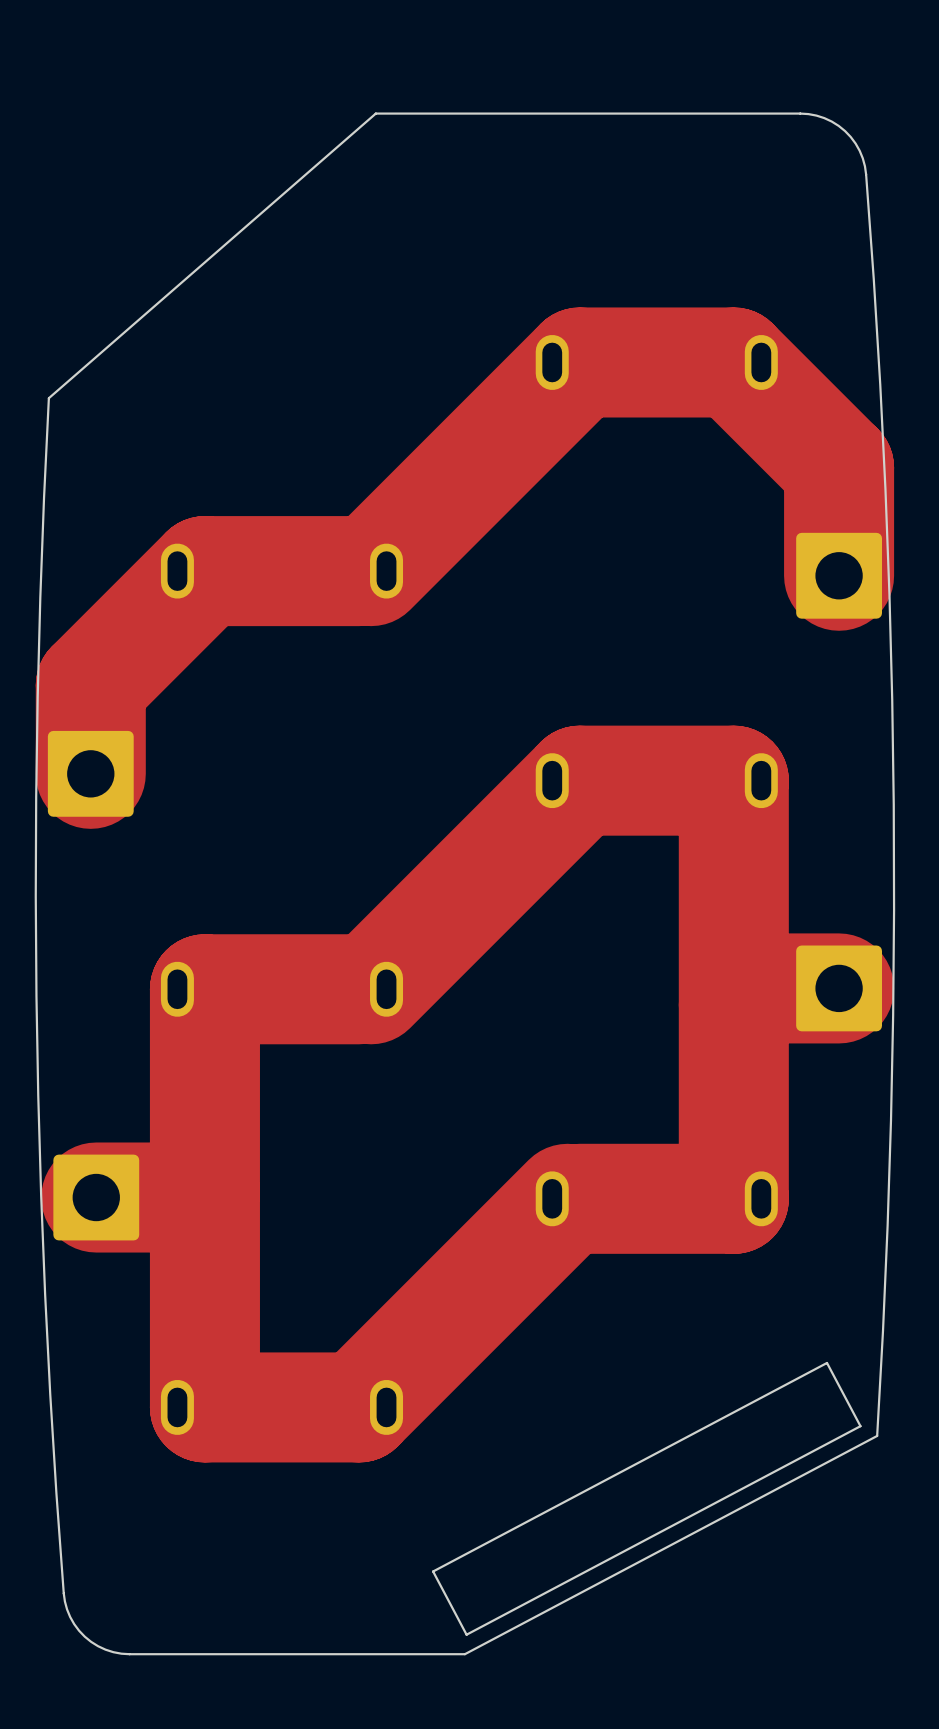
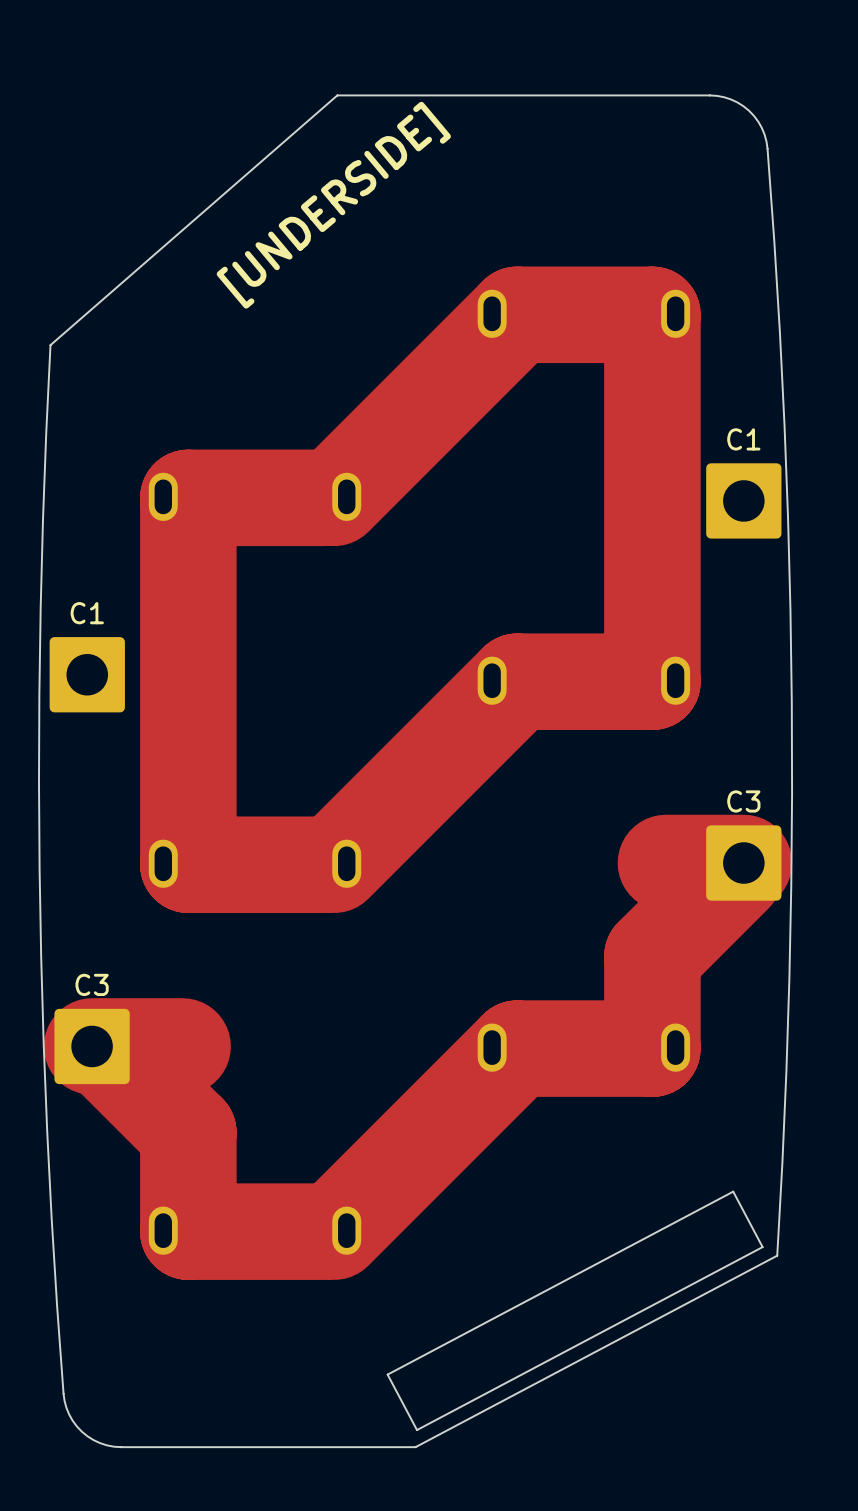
text: none -> [UNDERSIDE] (333, 205)
top track: none -> (517, 314) (334, 497) (188, 497) (188, 864) (334, 864) (517, 681) (652, 681) (652, 314) (517, 314)
C1 name: none -> C1 (743, 439)
top track: (839, 575) (839, 467) (733, 362) (579, 362) (371, 571) (204, 571) (90, 685) (90, 773) -> none
top track: (579, 780) (371, 989) (204, 989) (204, 1407) (359, 1407) (567, 1198) (733, 1198) (733, 780) (579, 780) -> none
C3 name: none -> C3 (743, 801)
top track: none -> (734, 874) (652, 956) (652, 1048) (517, 1048) (334, 1231) (188, 1231) (188, 1132) (102, 1047)
C3 name: none -> C3 (92, 984)

